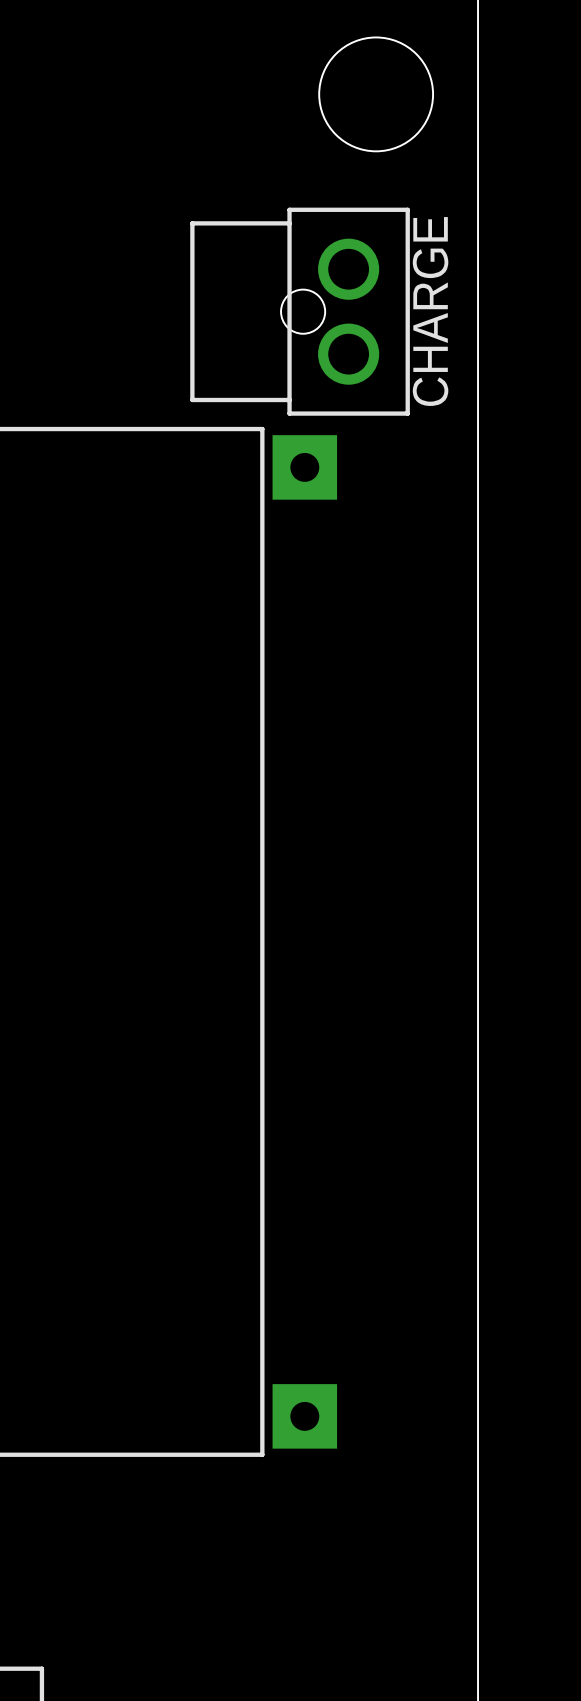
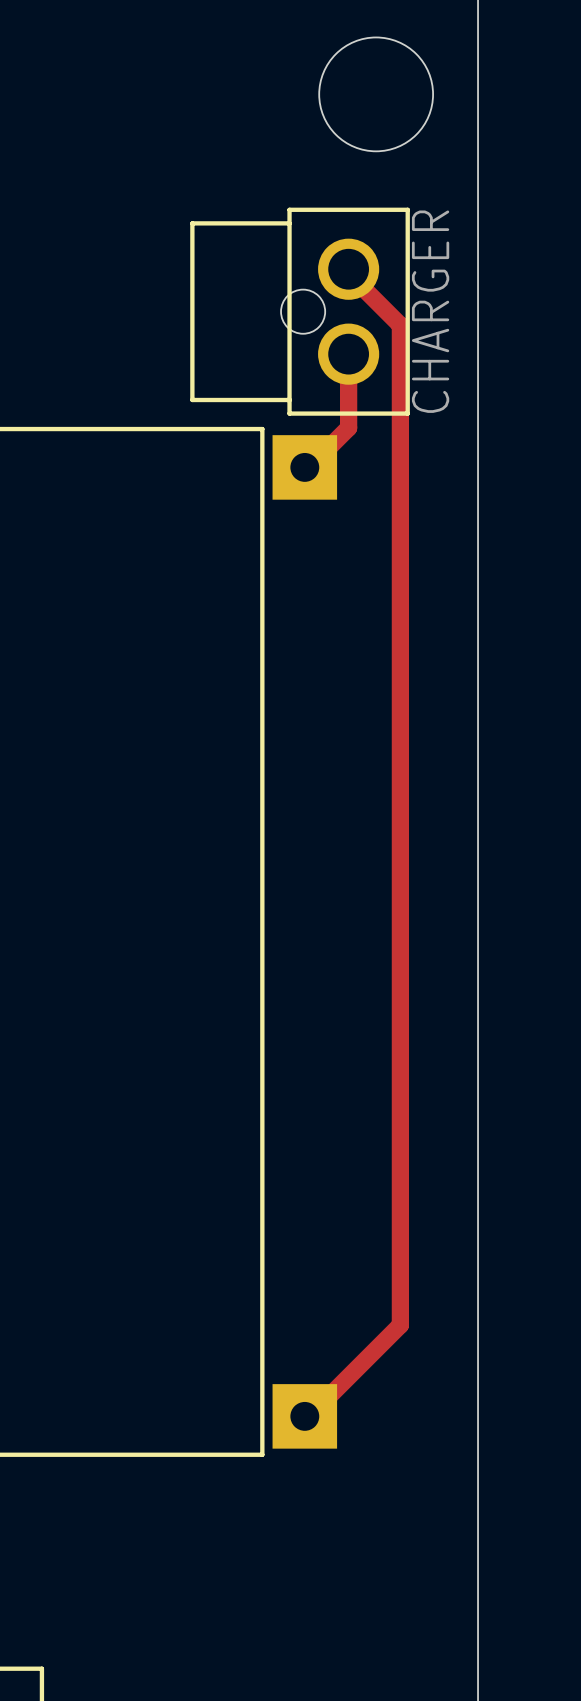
track: none -> (348, 273) (400, 325) (400, 1325) (304, 1420)
CHARGE name: CHARGE (430, 311) -> CHARGER (430, 311)
track: none -> (348, 358) (348, 427) (304, 471)

